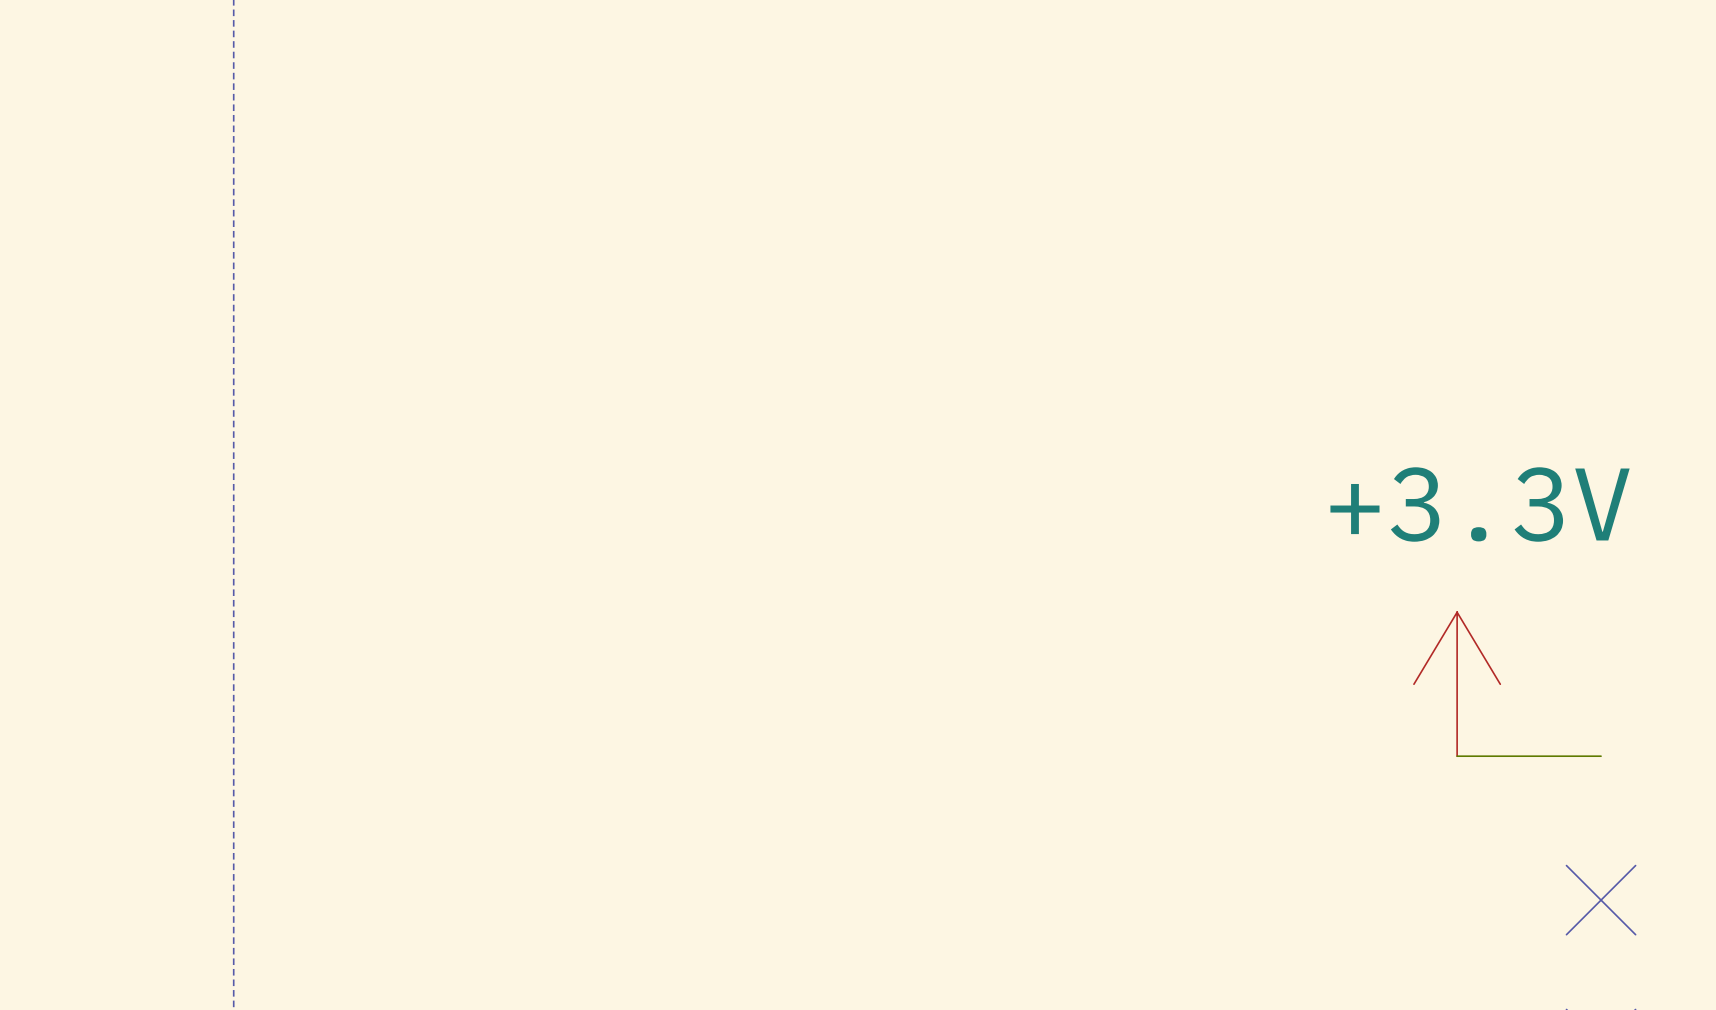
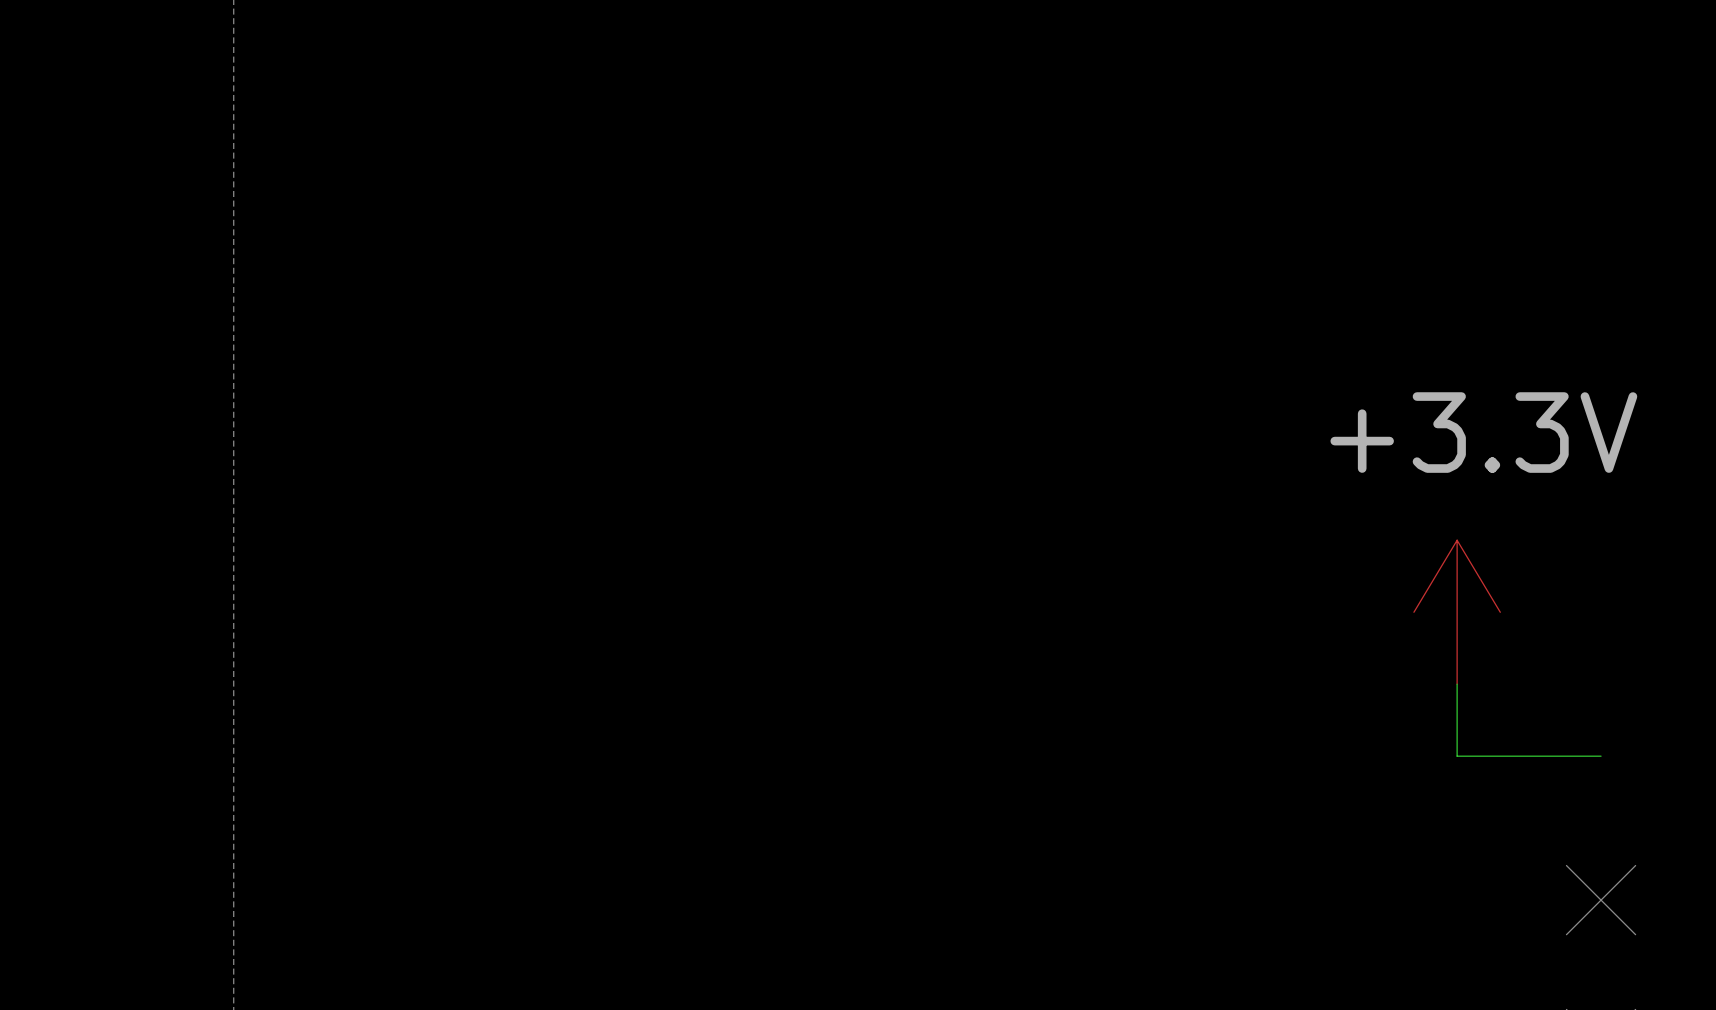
power symbol position: +3.3V (1457, 684) -> +3.3V (1457, 612)

